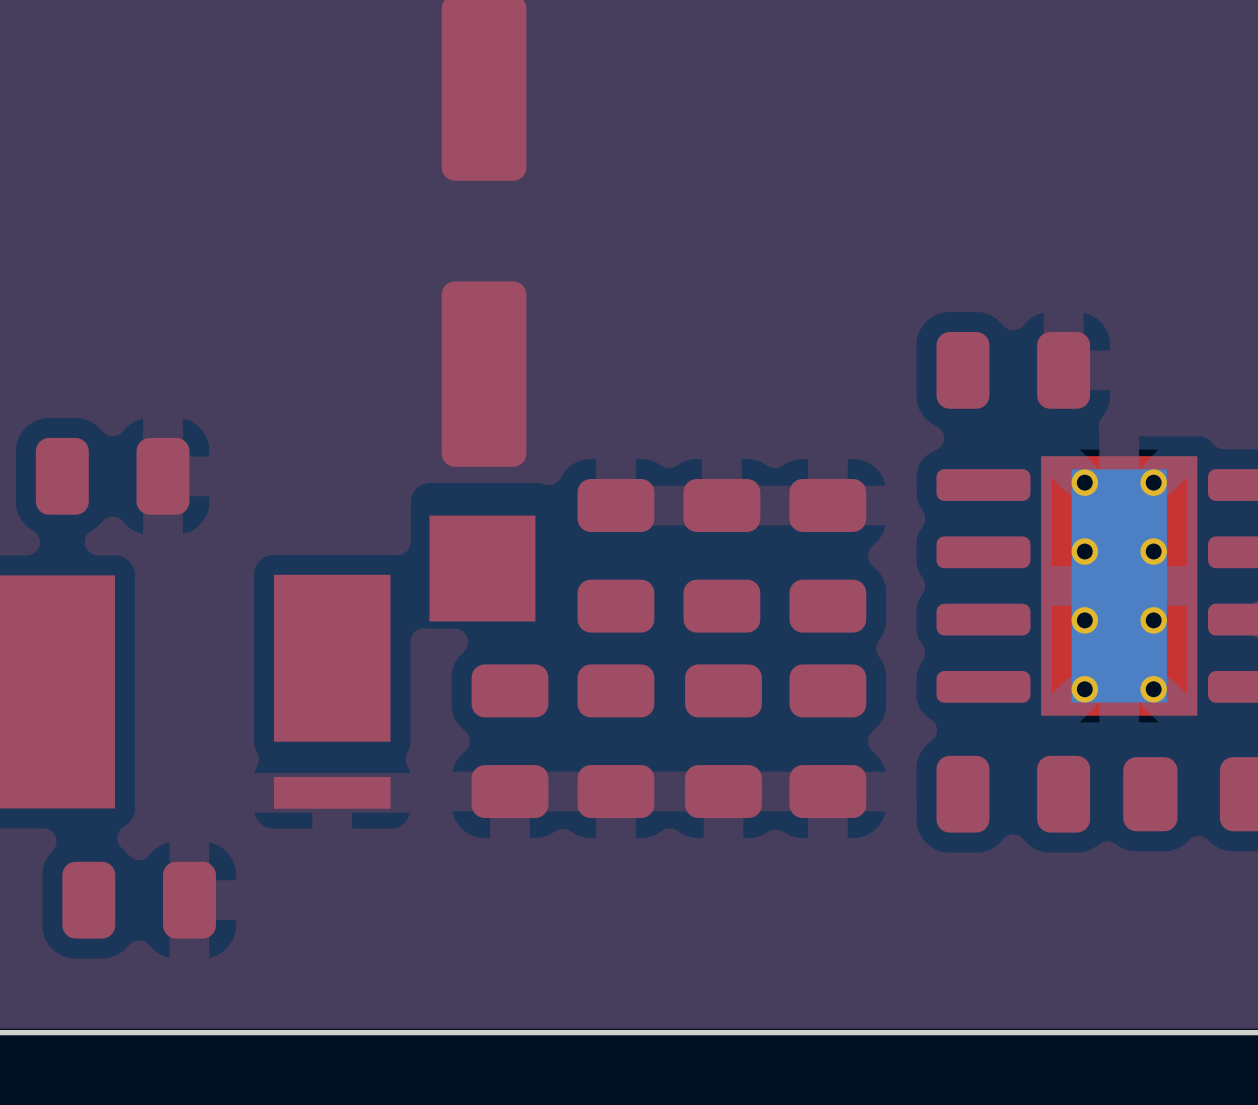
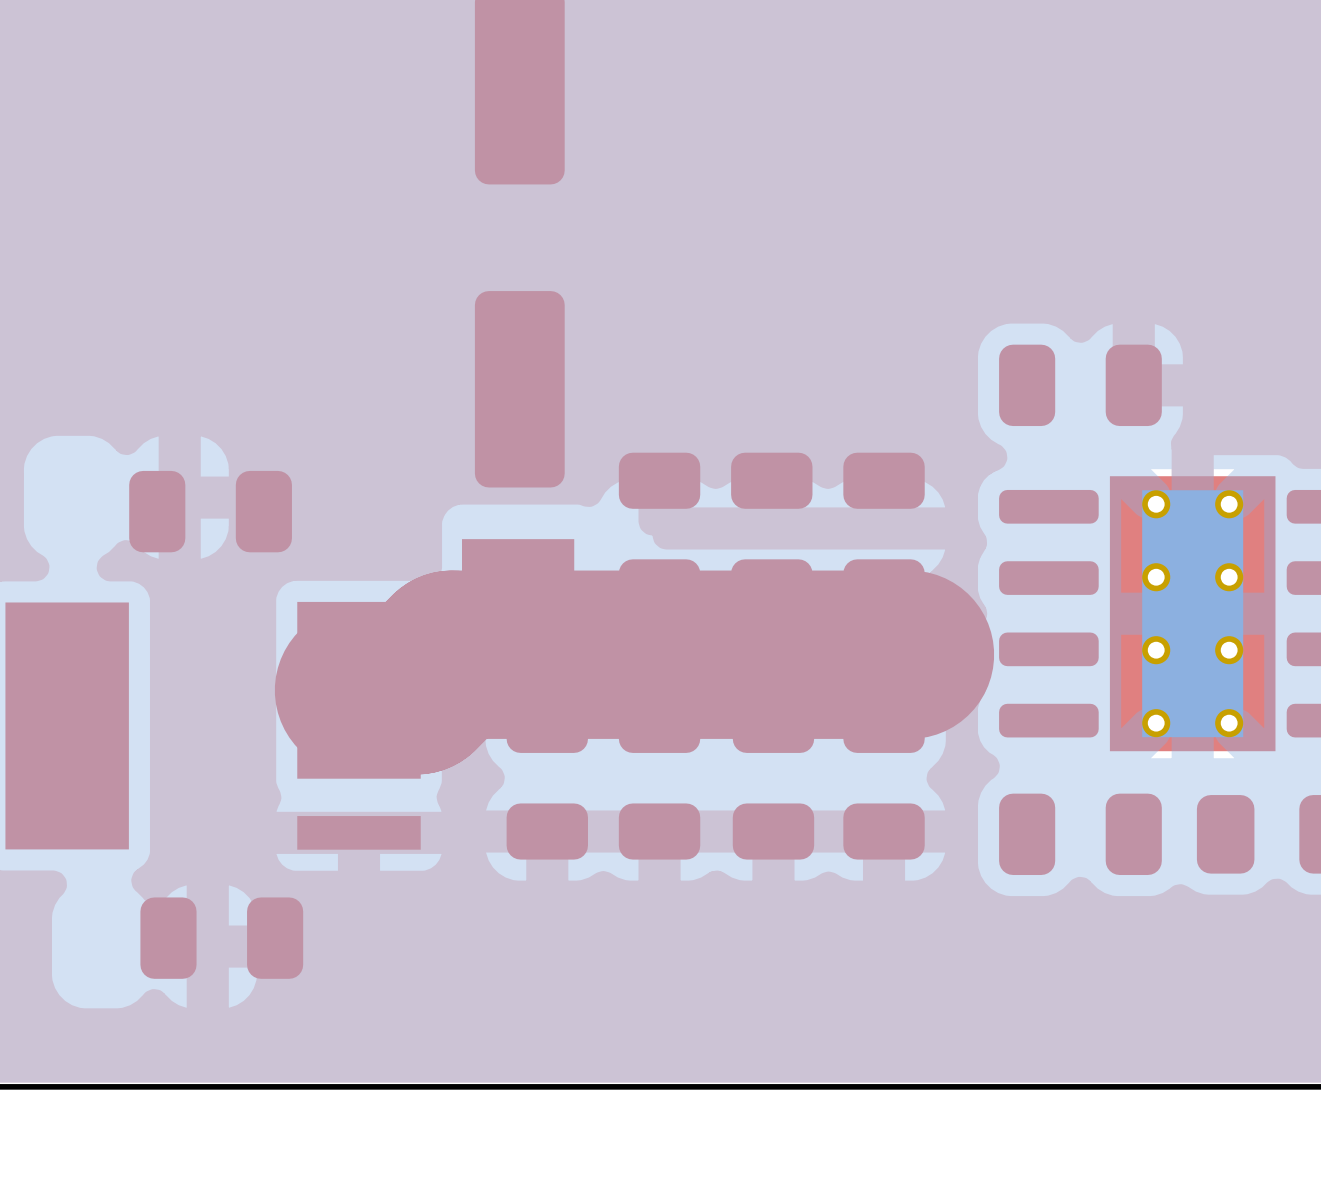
part position: (112, 476) -> (210, 511)
part position: (615, 555) -> (659, 534)
part position: (721, 555) -> (771, 534)
part position: (827, 555) -> (884, 534)
top track: none -> (909, 654) (451, 654) (416, 690) (359, 690)
part position: (139, 900) -> (221, 938)

